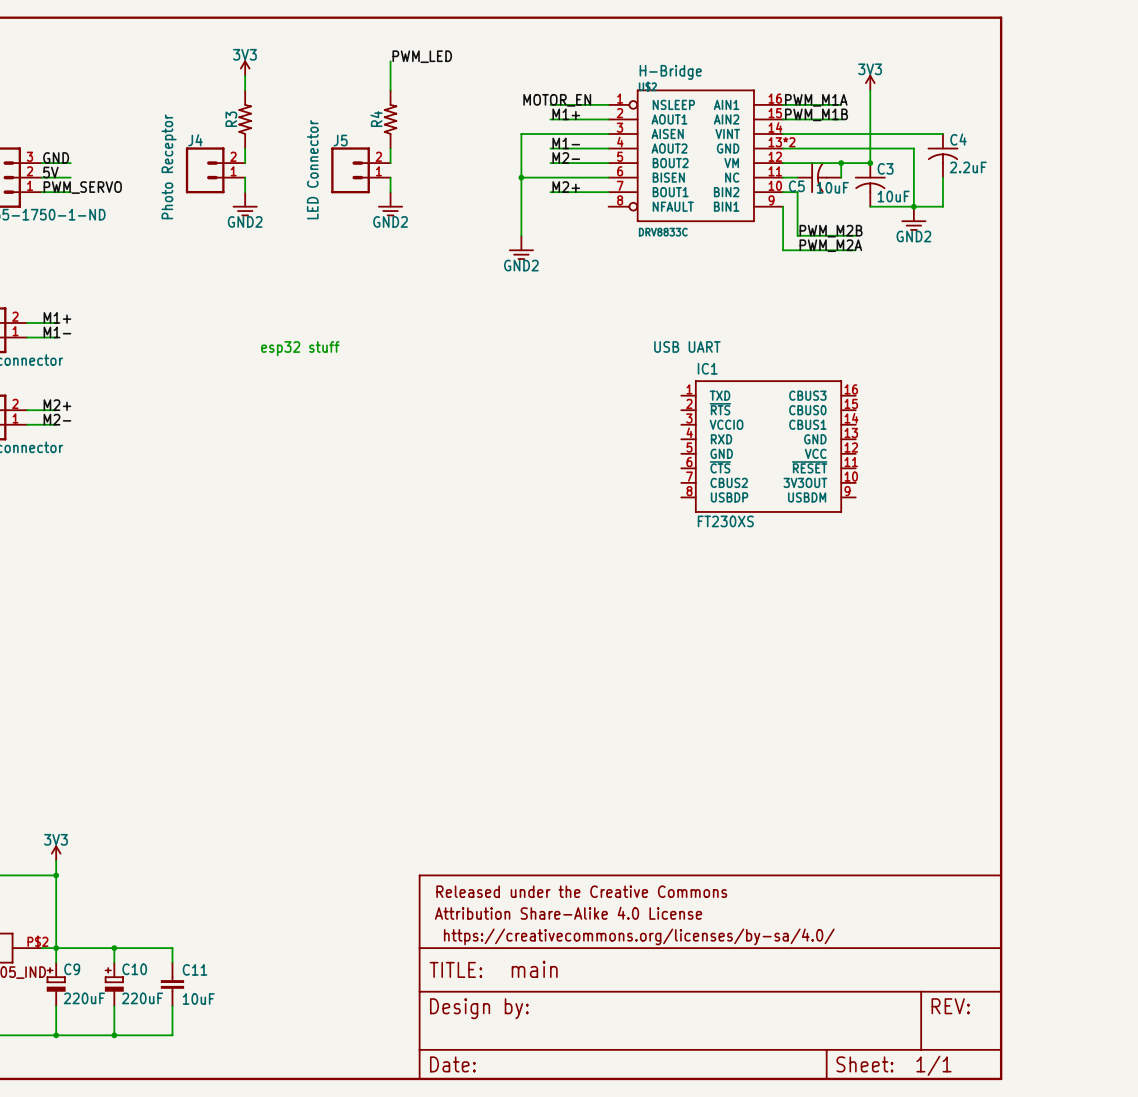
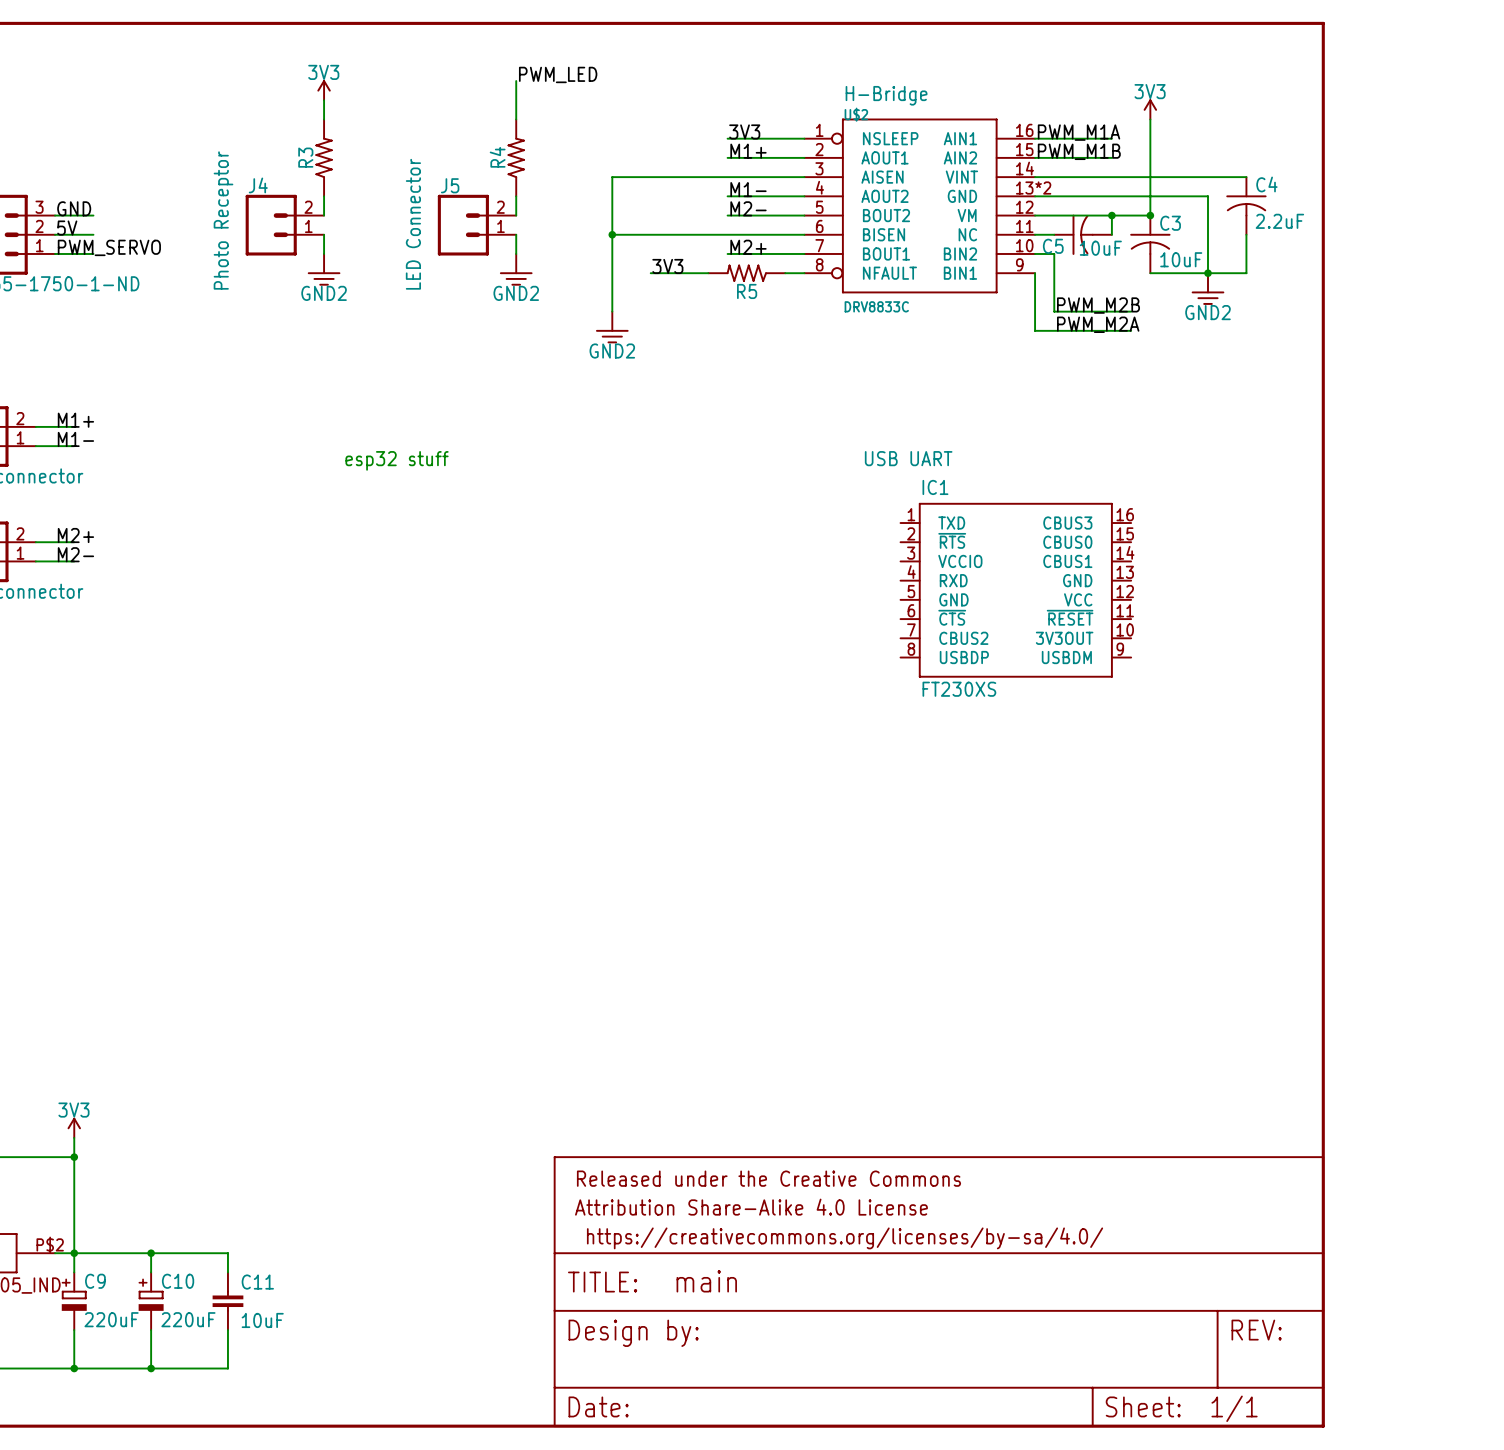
label: none -> 3V3 (744, 131)
label: MOTOR_EN (557, 100) -> none
wire: (521, 134) (521, 235) -> (689, 177) (612, 177) (612, 311)
wire: none -> (612, 234) (689, 234)
junction: none -> (612, 234)
junction: (521, 177) -> none
label: none -> 3V3 (667, 266)
wire: none -> (650, 273) (708, 273)
R5: none -> (746, 273)
wire: none -> (785, 273) (804, 273)
power symbol position: GND2 (521, 247) -> GND2 (612, 327)

